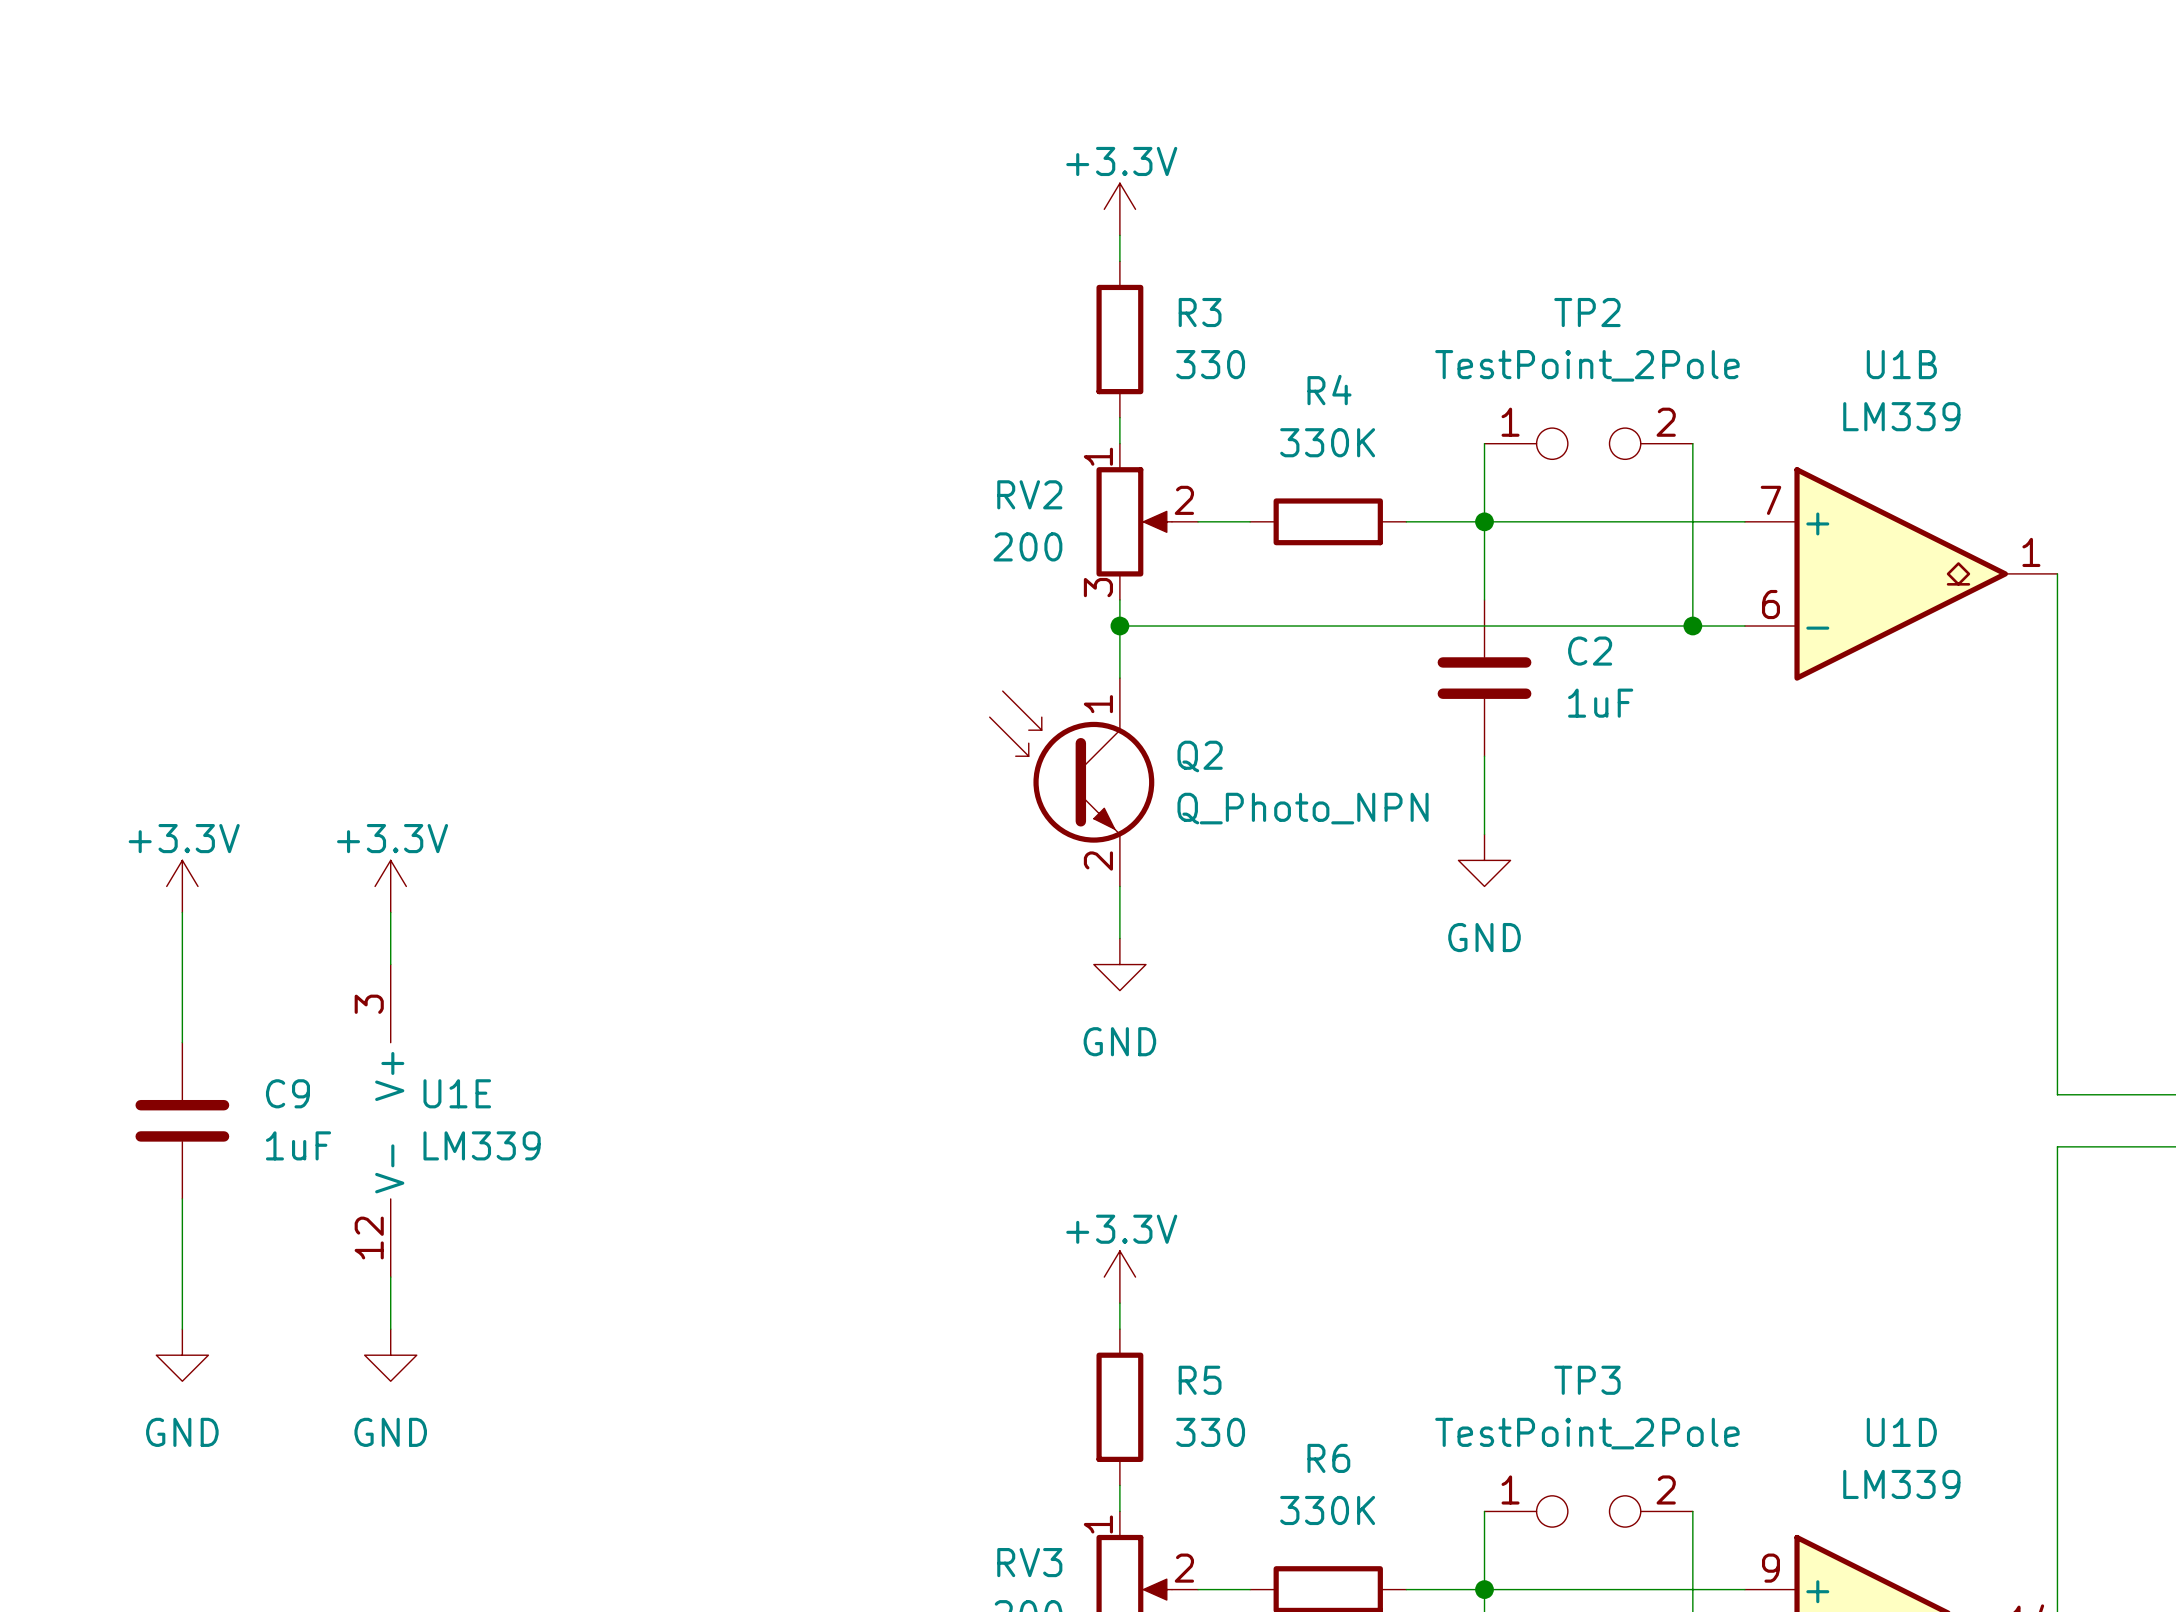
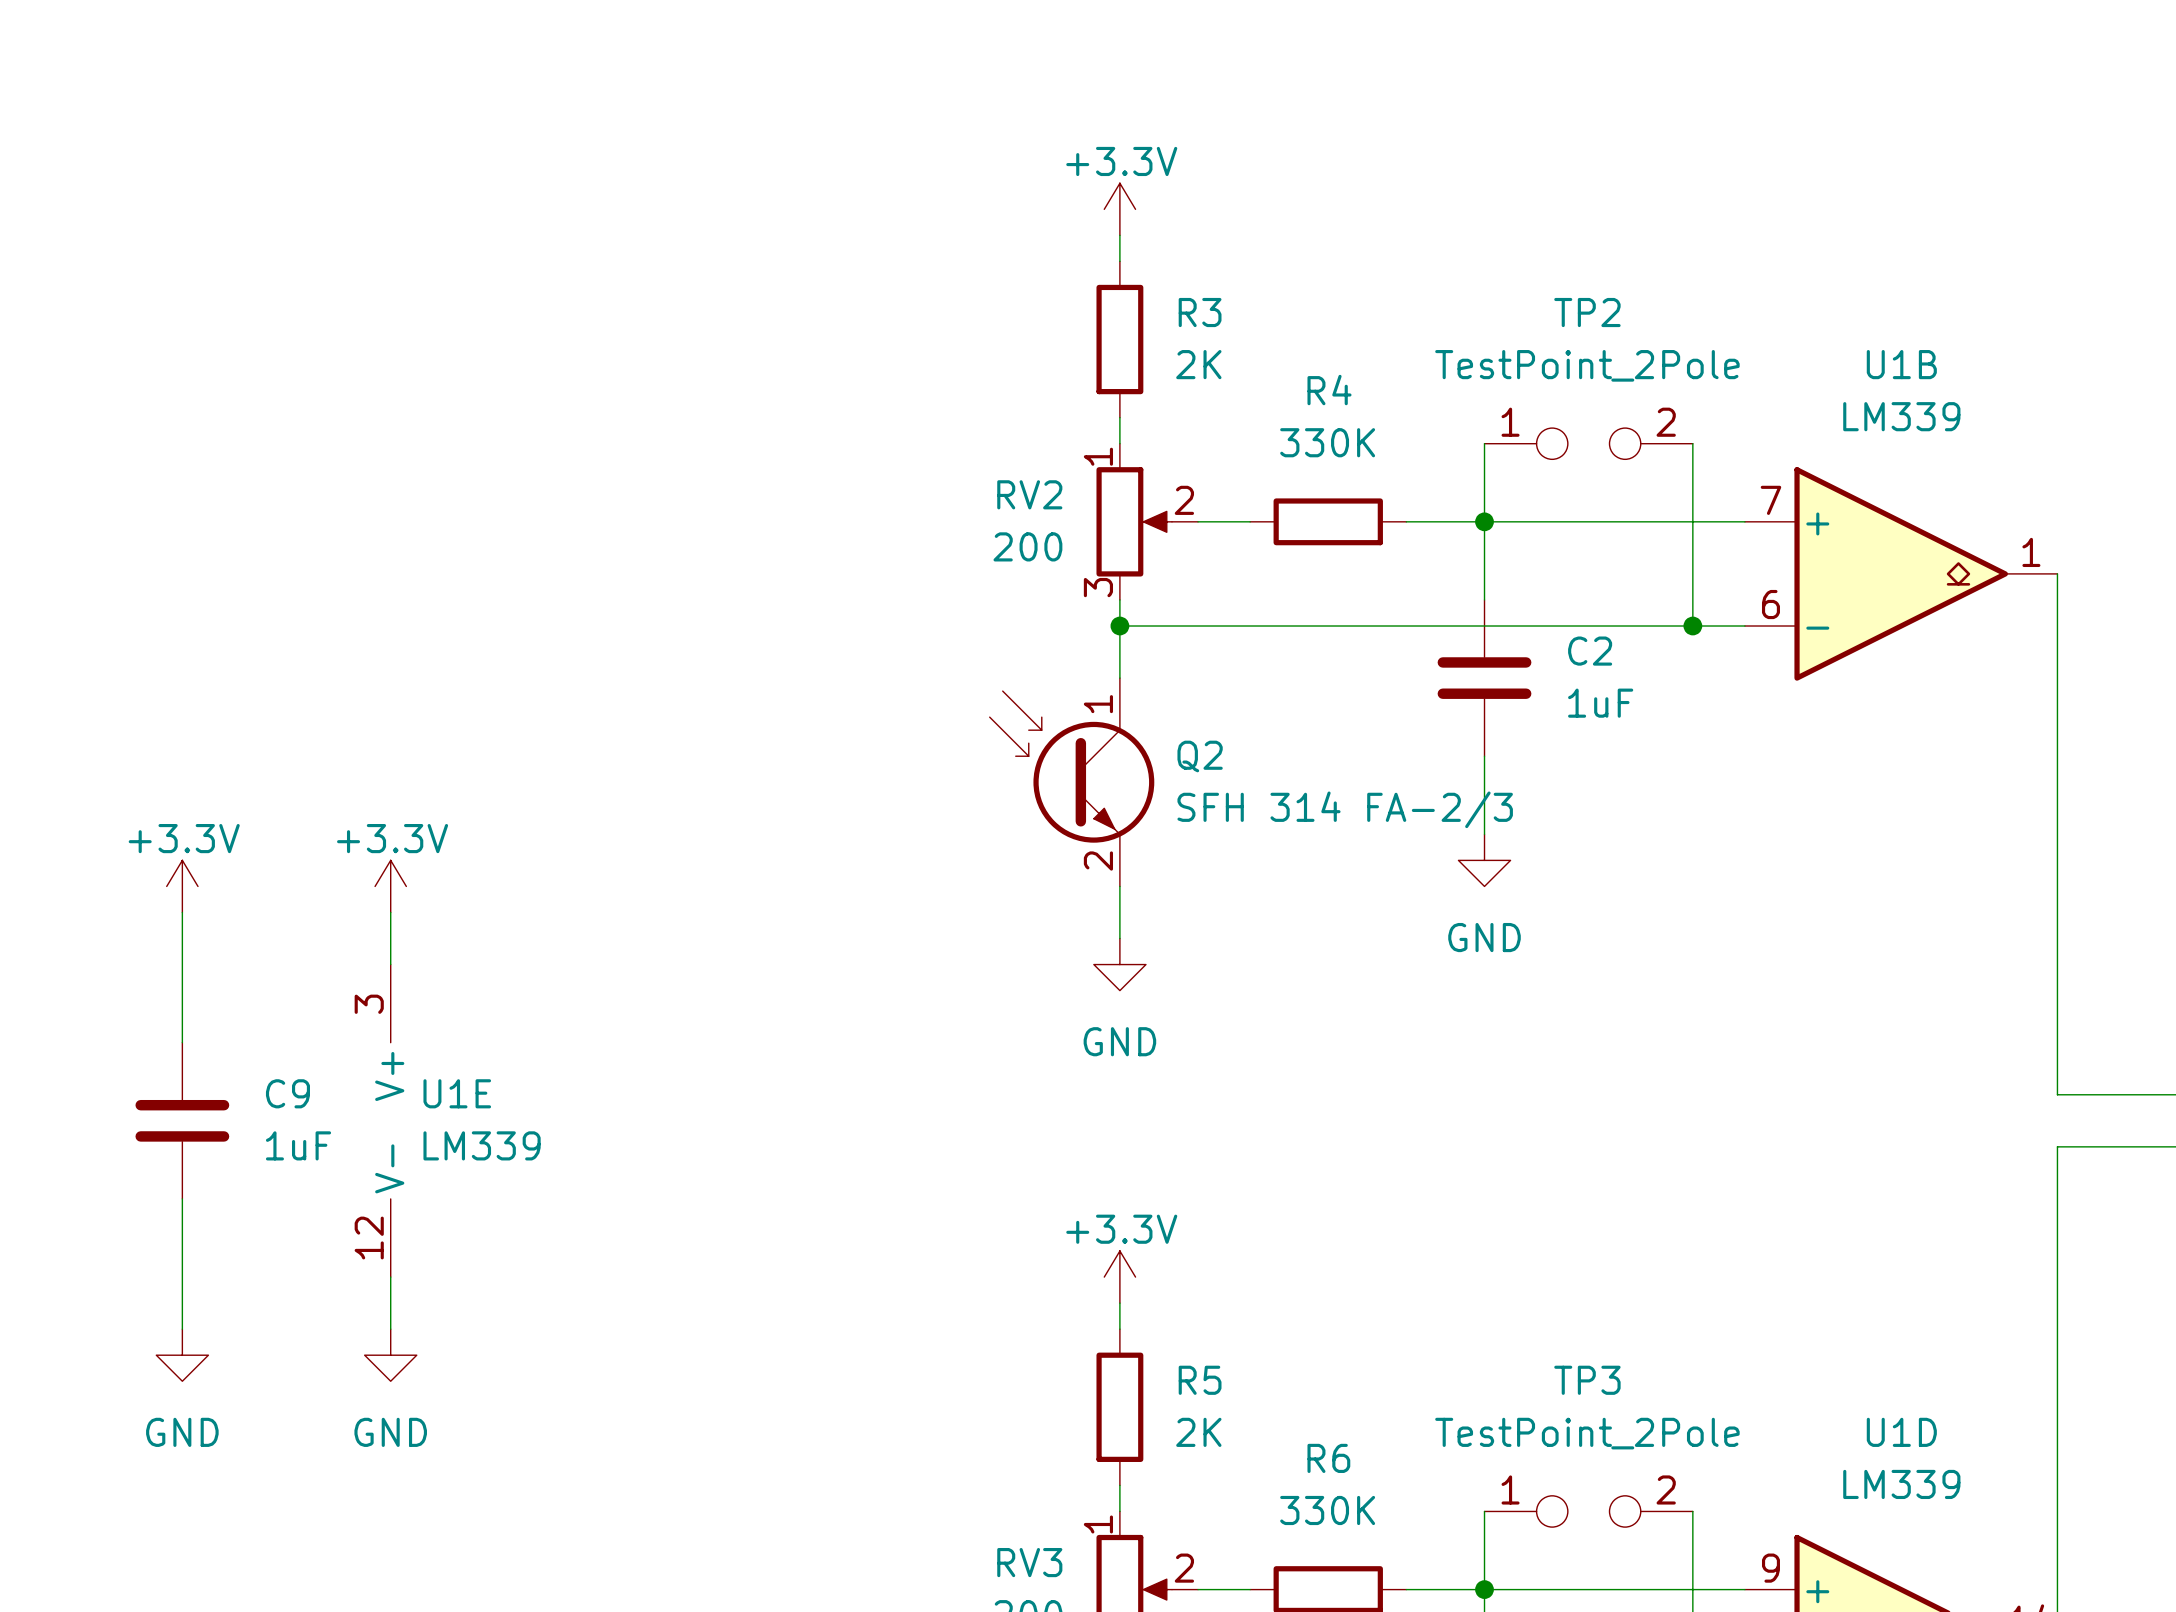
R3 value: 330 (1210, 364) -> 2K (1198, 364)
Q2 value: Q_Photo_NPN (1303, 808) -> SFH 314 FA-2/3 (1345, 809)
R5 value: 330 (1210, 1432) -> 2K (1198, 1432)

